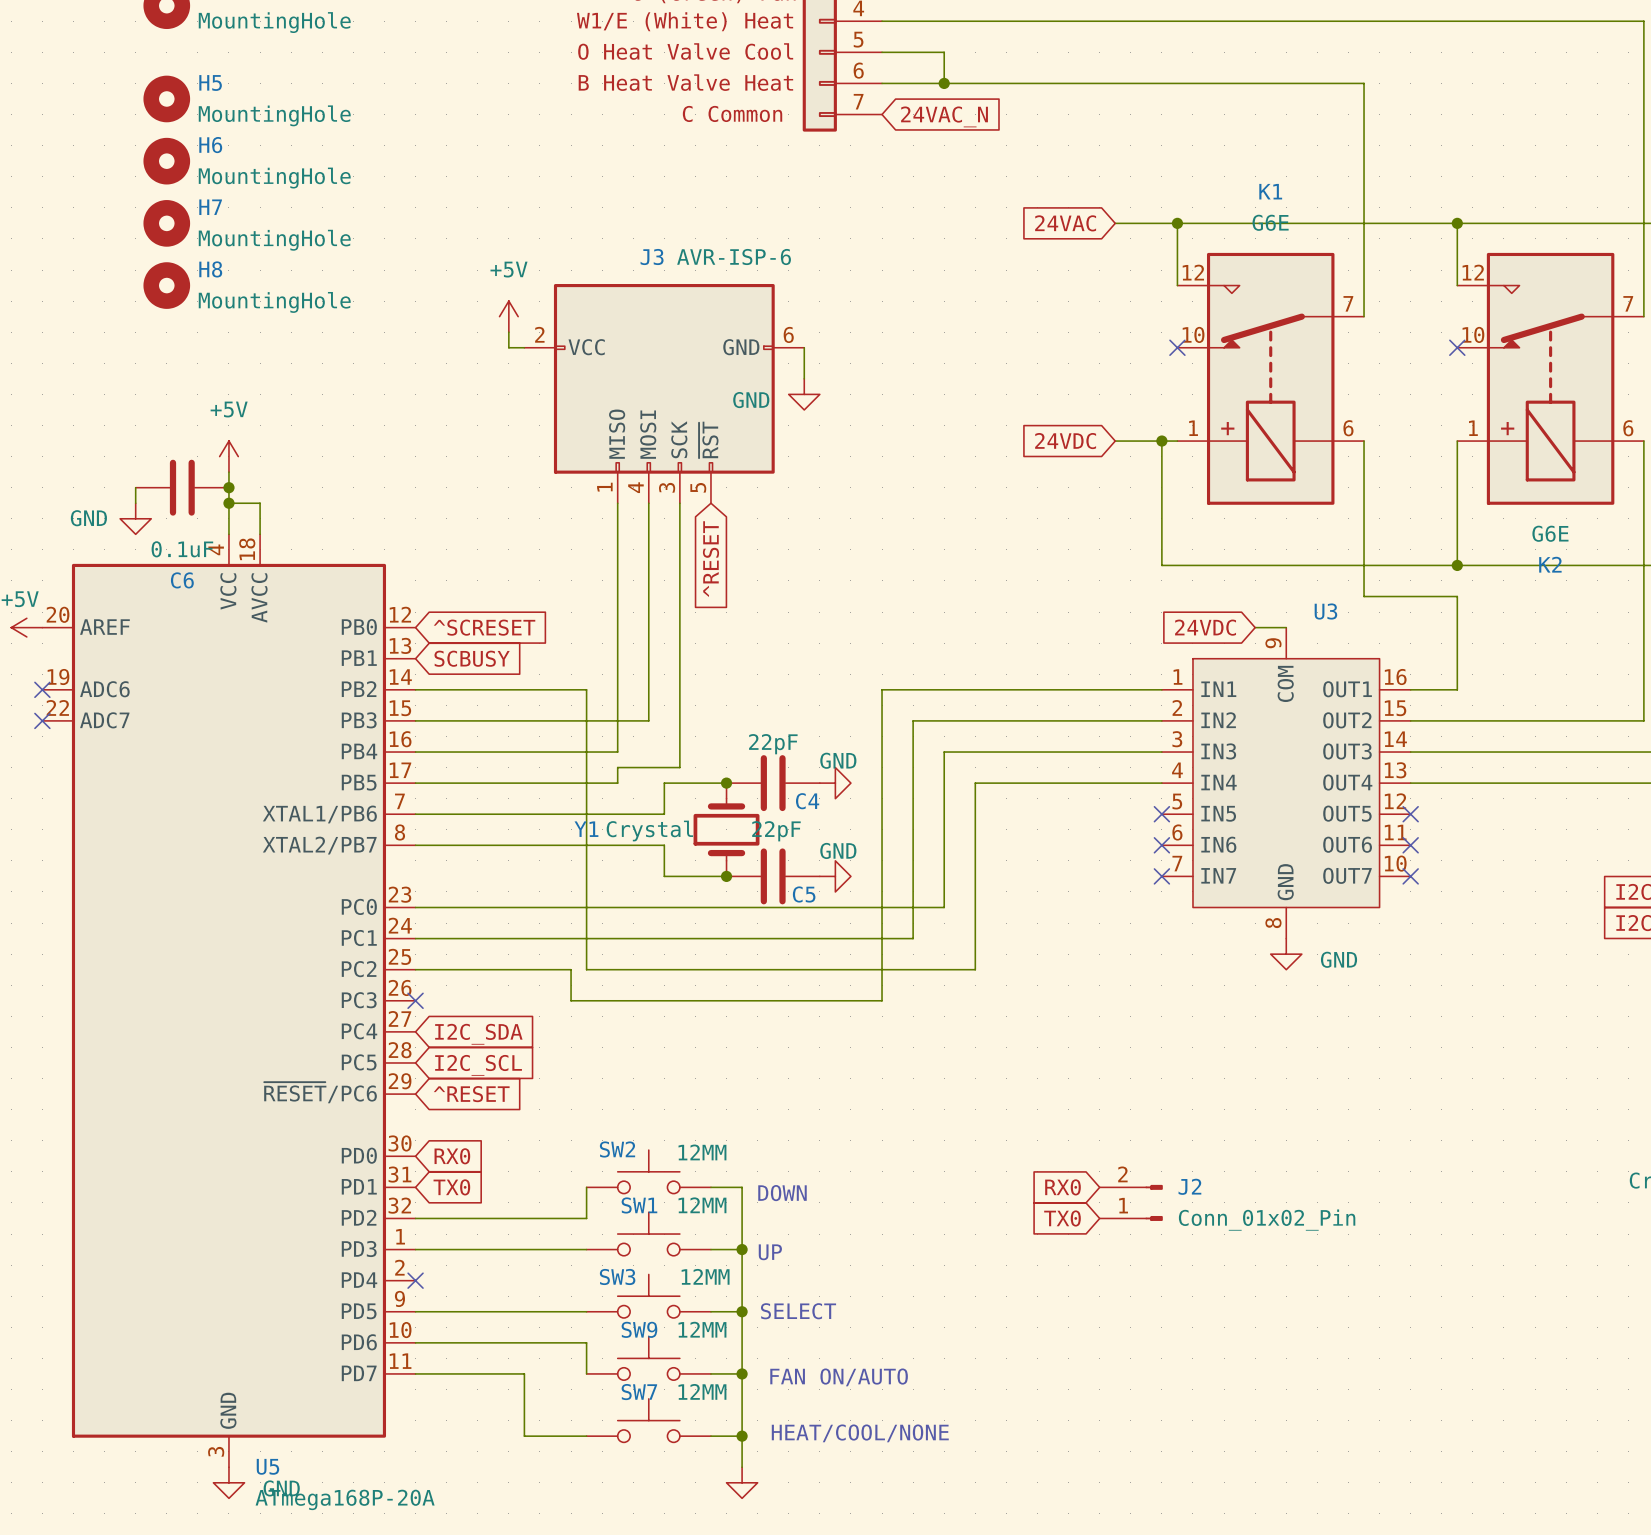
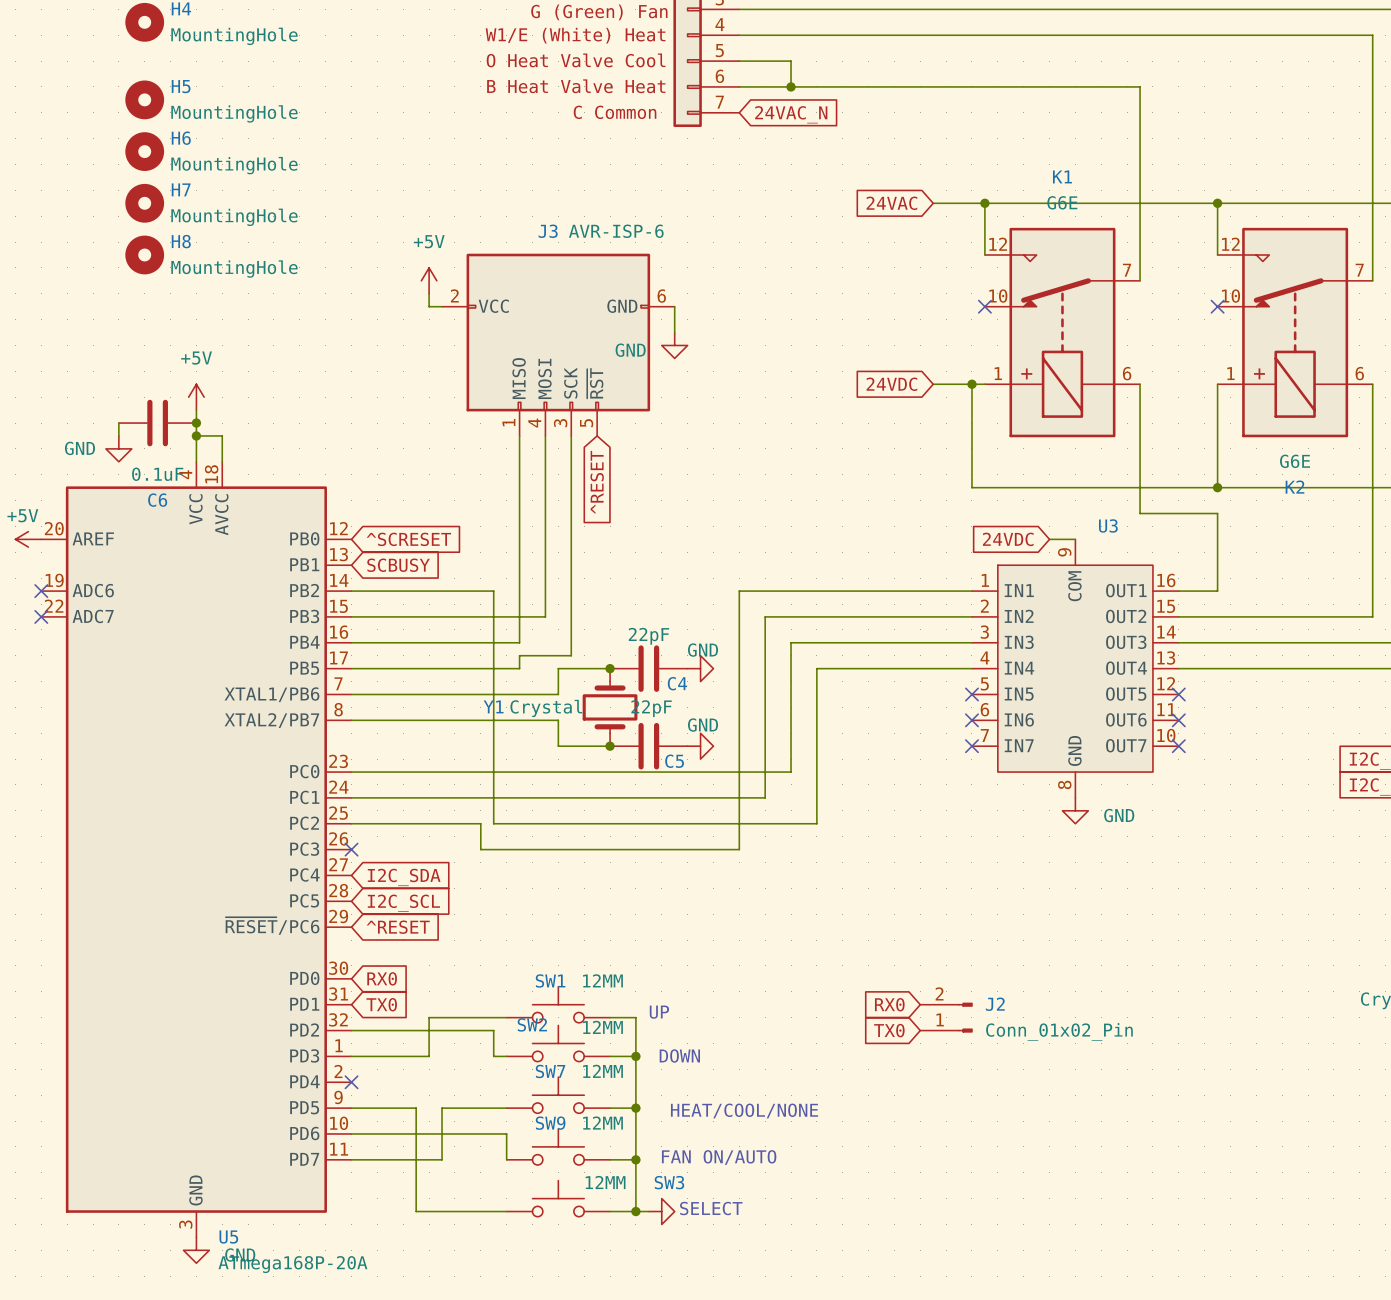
SW2 position: (648, 1171) -> (558, 1043)
wire: (586, 1187) (586, 1218) -> (506, 1056) (493, 1056) (493, 1030)
wire: (710, 1187) (742, 1187) (742, 1467) -> none
text position: DOWN (782, 1193) -> DOWN (679, 1055)
wire: none -> (610, 1017) (635, 1017) (635, 1211)
SW1 position: (648, 1234) -> (558, 1004)
wire: (508, 1249) (586, 1249) -> (429, 1056) (429, 1017) (506, 1017)
junction position: (742, 1249) -> (635, 1056)
text position: UP (770, 1252) -> UP (659, 1012)
SW3 name position: SW3 (617, 1276) -> SW3 (669, 1182)
SW3 position: (648, 1296) -> (558, 1198)
wire: (493, 1311) (524, 1311) -> (442, 1159) (442, 1108)
junction position: (742, 1311) -> (635, 1108)
text position: SELECT (798, 1311) -> SELECT (711, 1208)
wire: (586, 1342) (586, 1373) -> (493, 1133) (506, 1133) (506, 1159)
SW9 position: (648, 1358) -> (558, 1146)
wire: (524, 1373) (524, 1436) -> (416, 1108) (416, 1211) (442, 1211)
junction position: (742, 1373) -> (635, 1159)
text position: FAN ON/AUTO (839, 1377) -> FAN ON/AUTO (719, 1157)
SW7 position: (648, 1420) -> (558, 1095)
text position: HEAT/COOL/NONE (860, 1433) -> HEAT/COOL/NONE (744, 1110)
wire: none -> (622, 1211) (648, 1211)
junction position: (742, 1436) -> (635, 1211)
power symbol rotation: 0° (742, 1482) -> 90° counterclockwise (661, 1211)
power symbol position: (742, 1482) -> (661, 1211)

